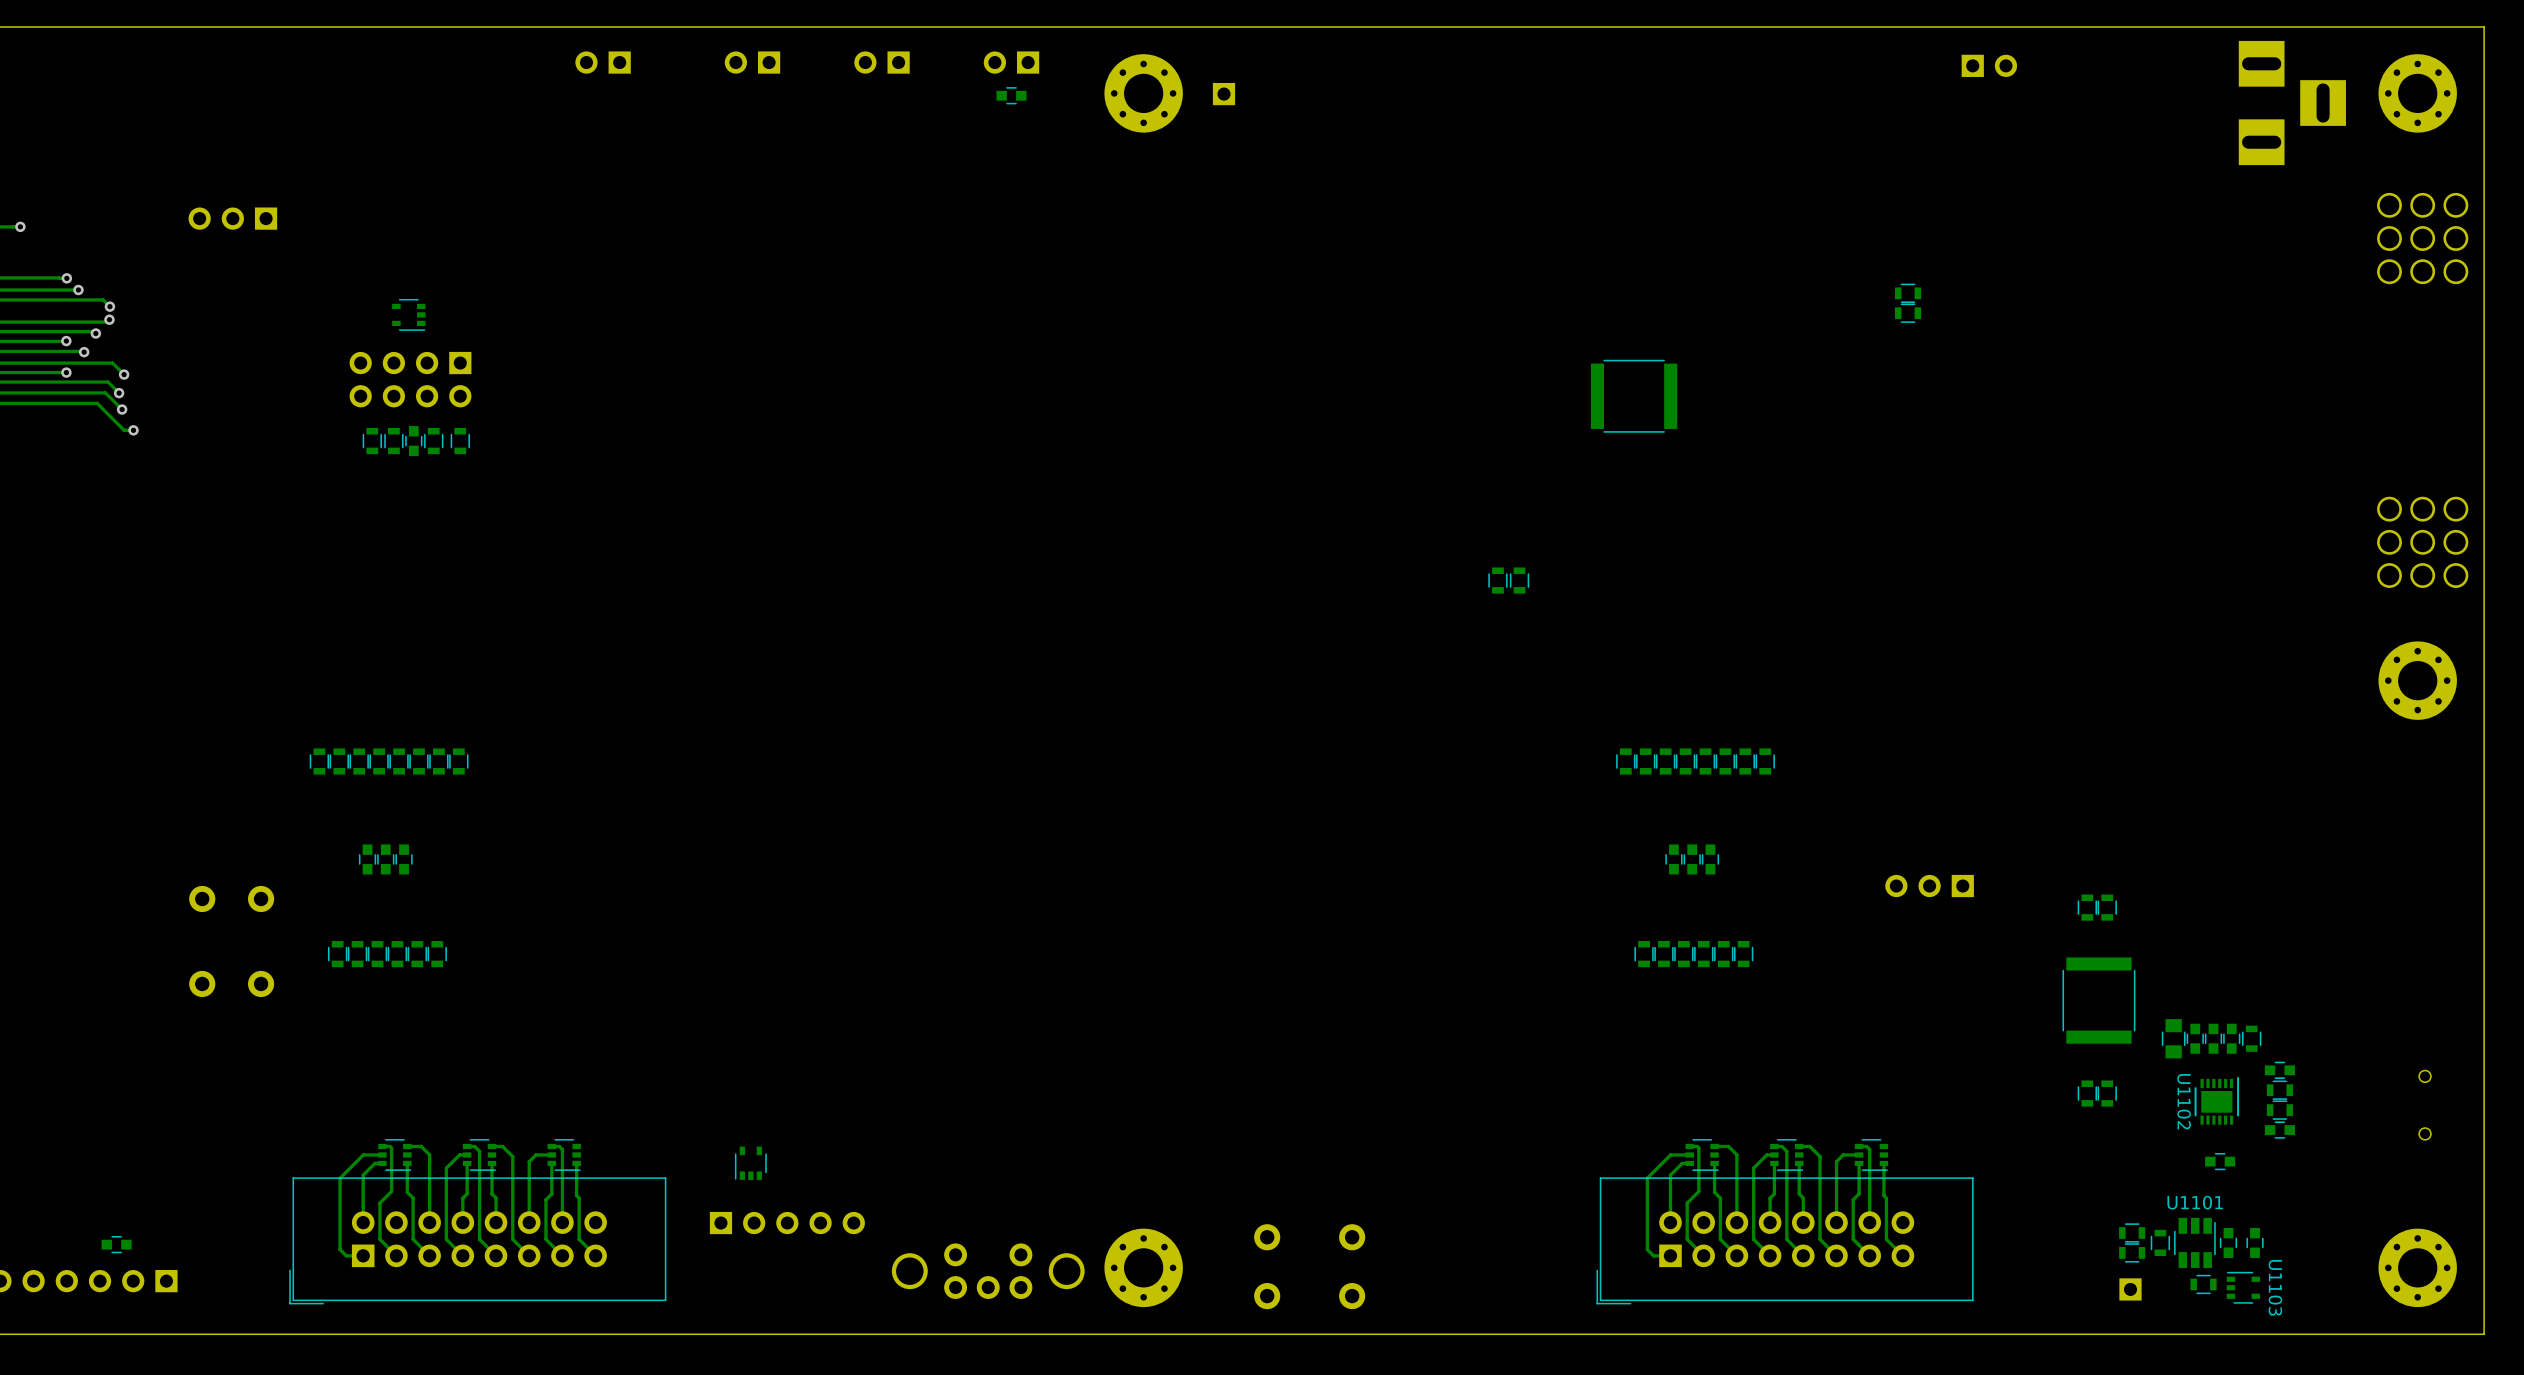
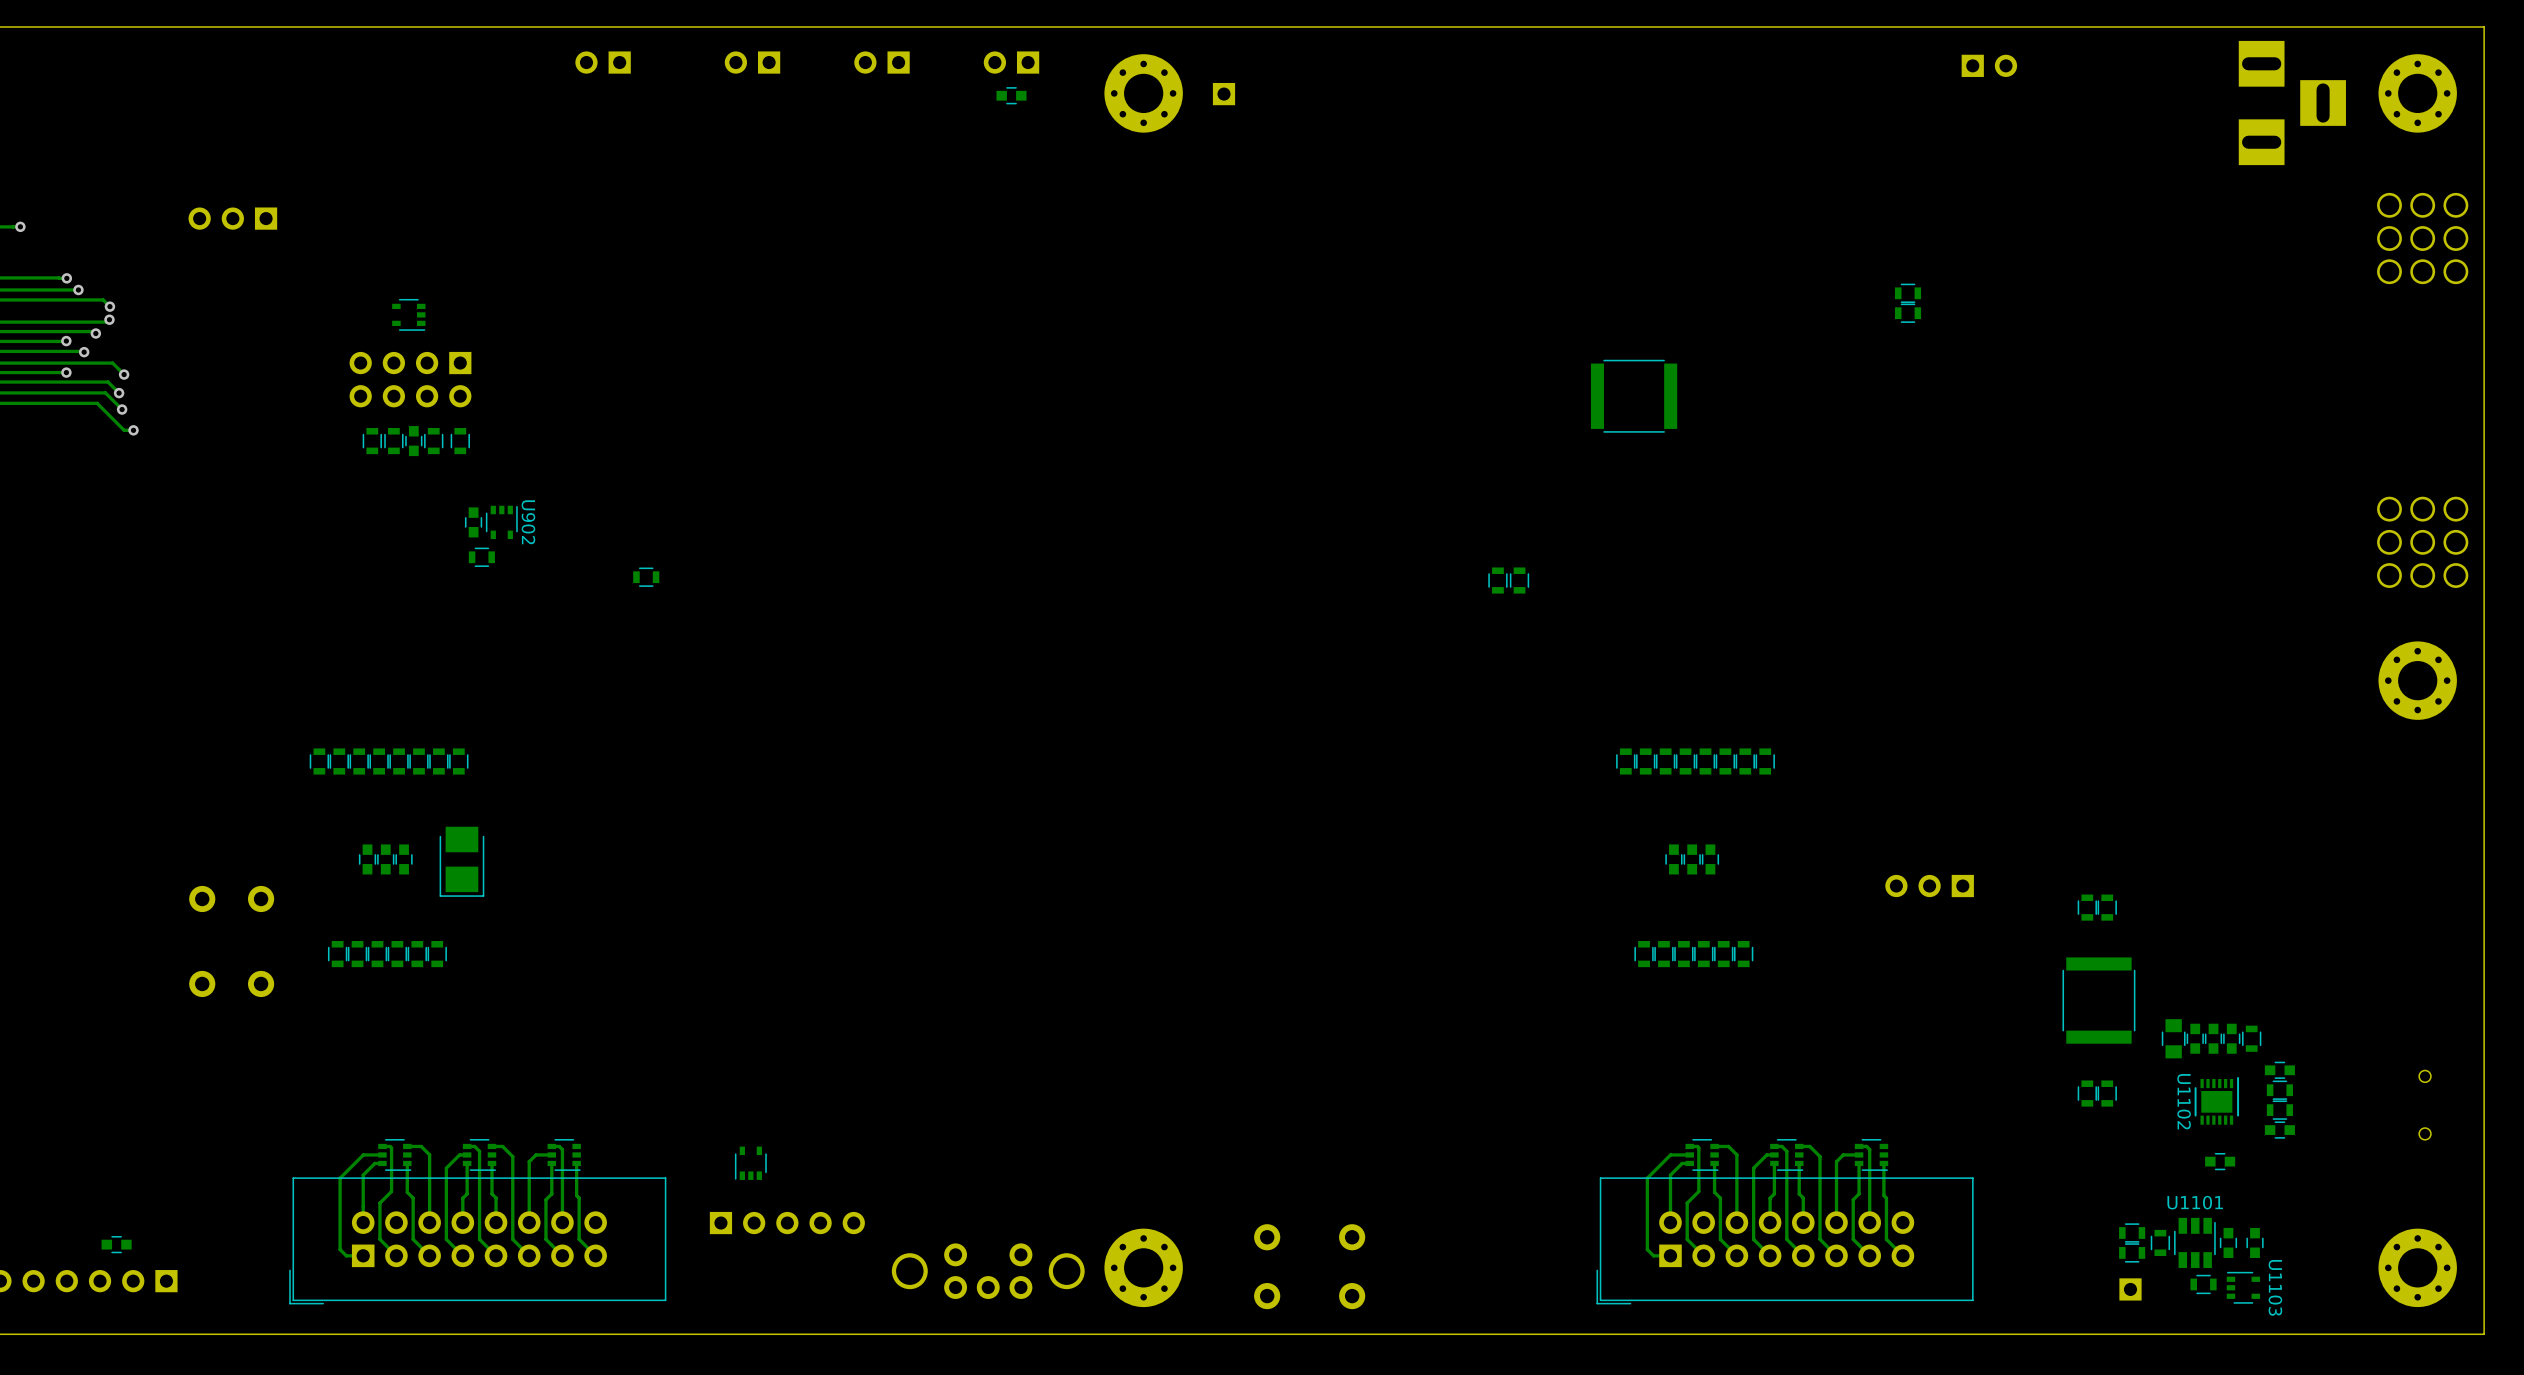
part: none -> (473, 522)
U902: none -> (501, 522)
part: none -> (481, 557)
part: none -> (646, 577)
part: none -> (461, 861)

